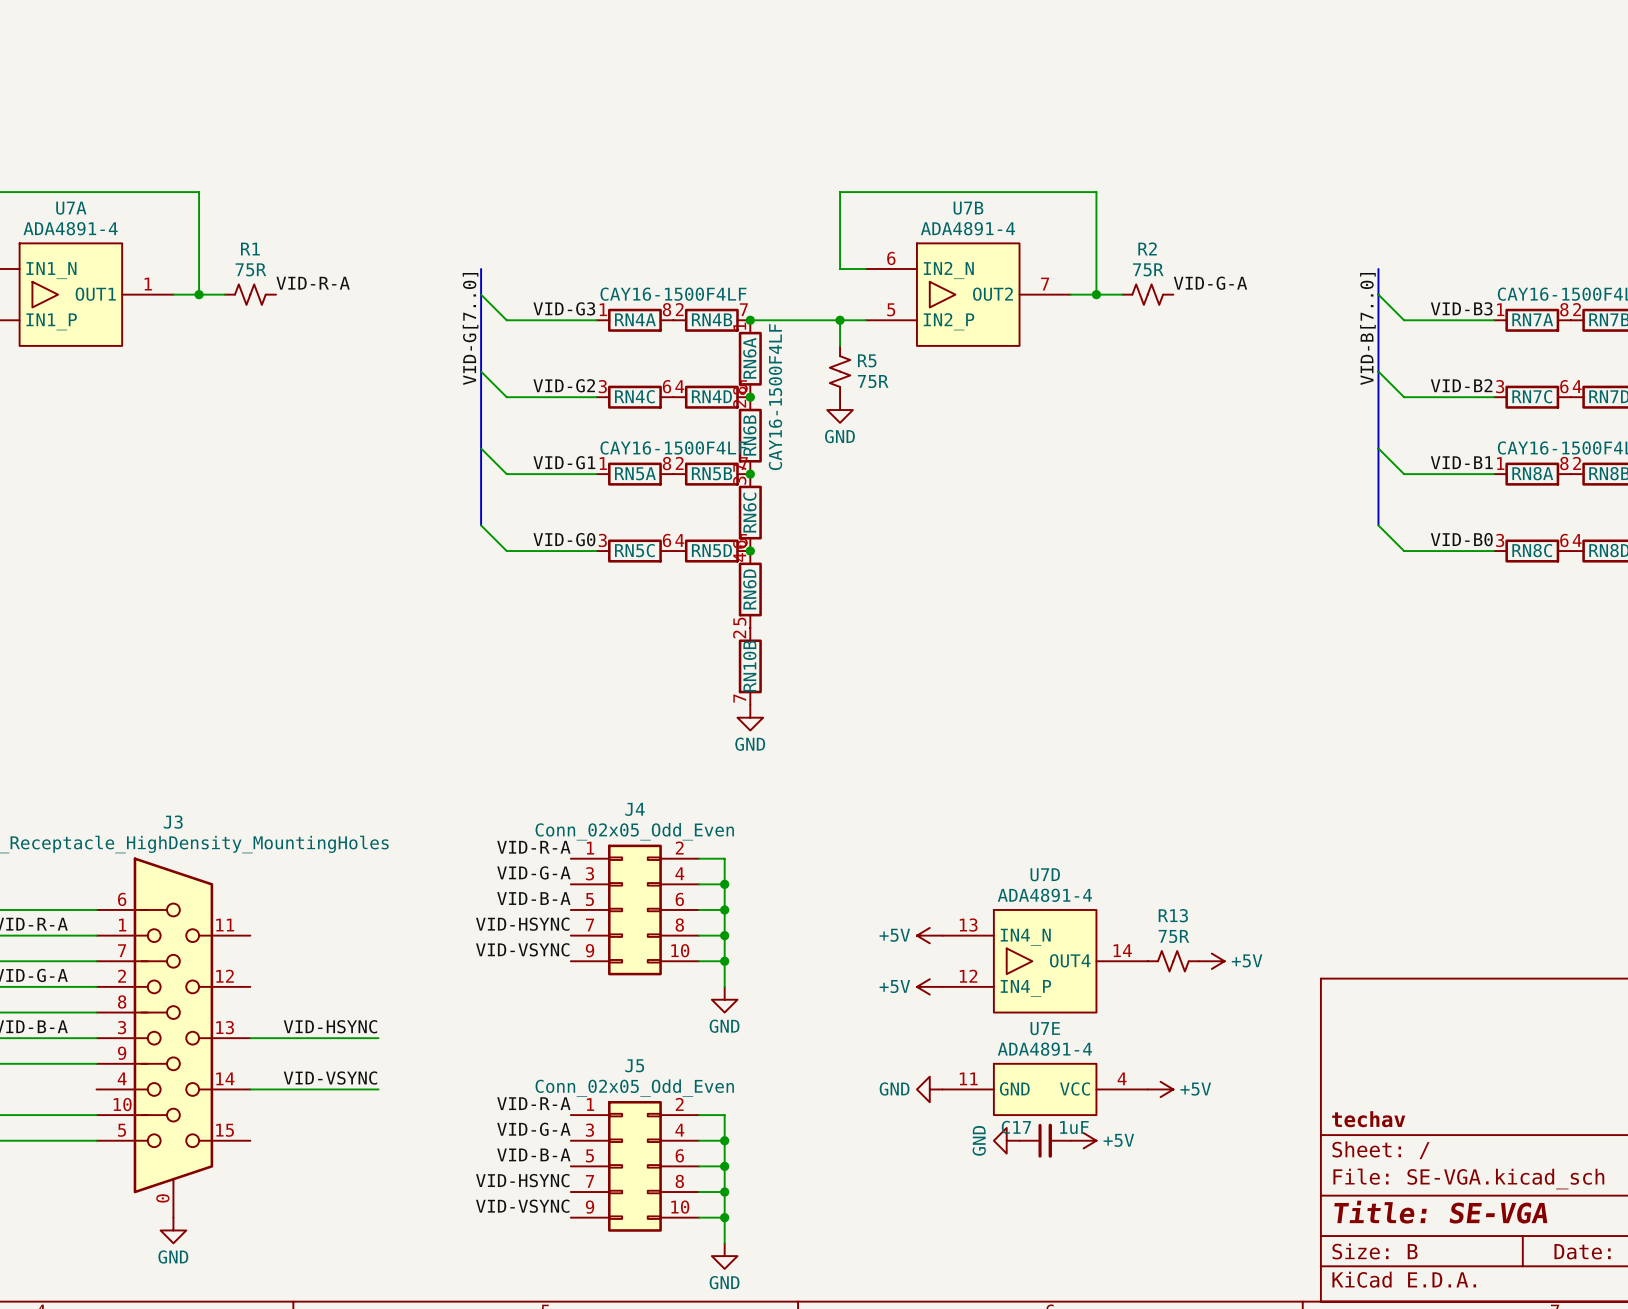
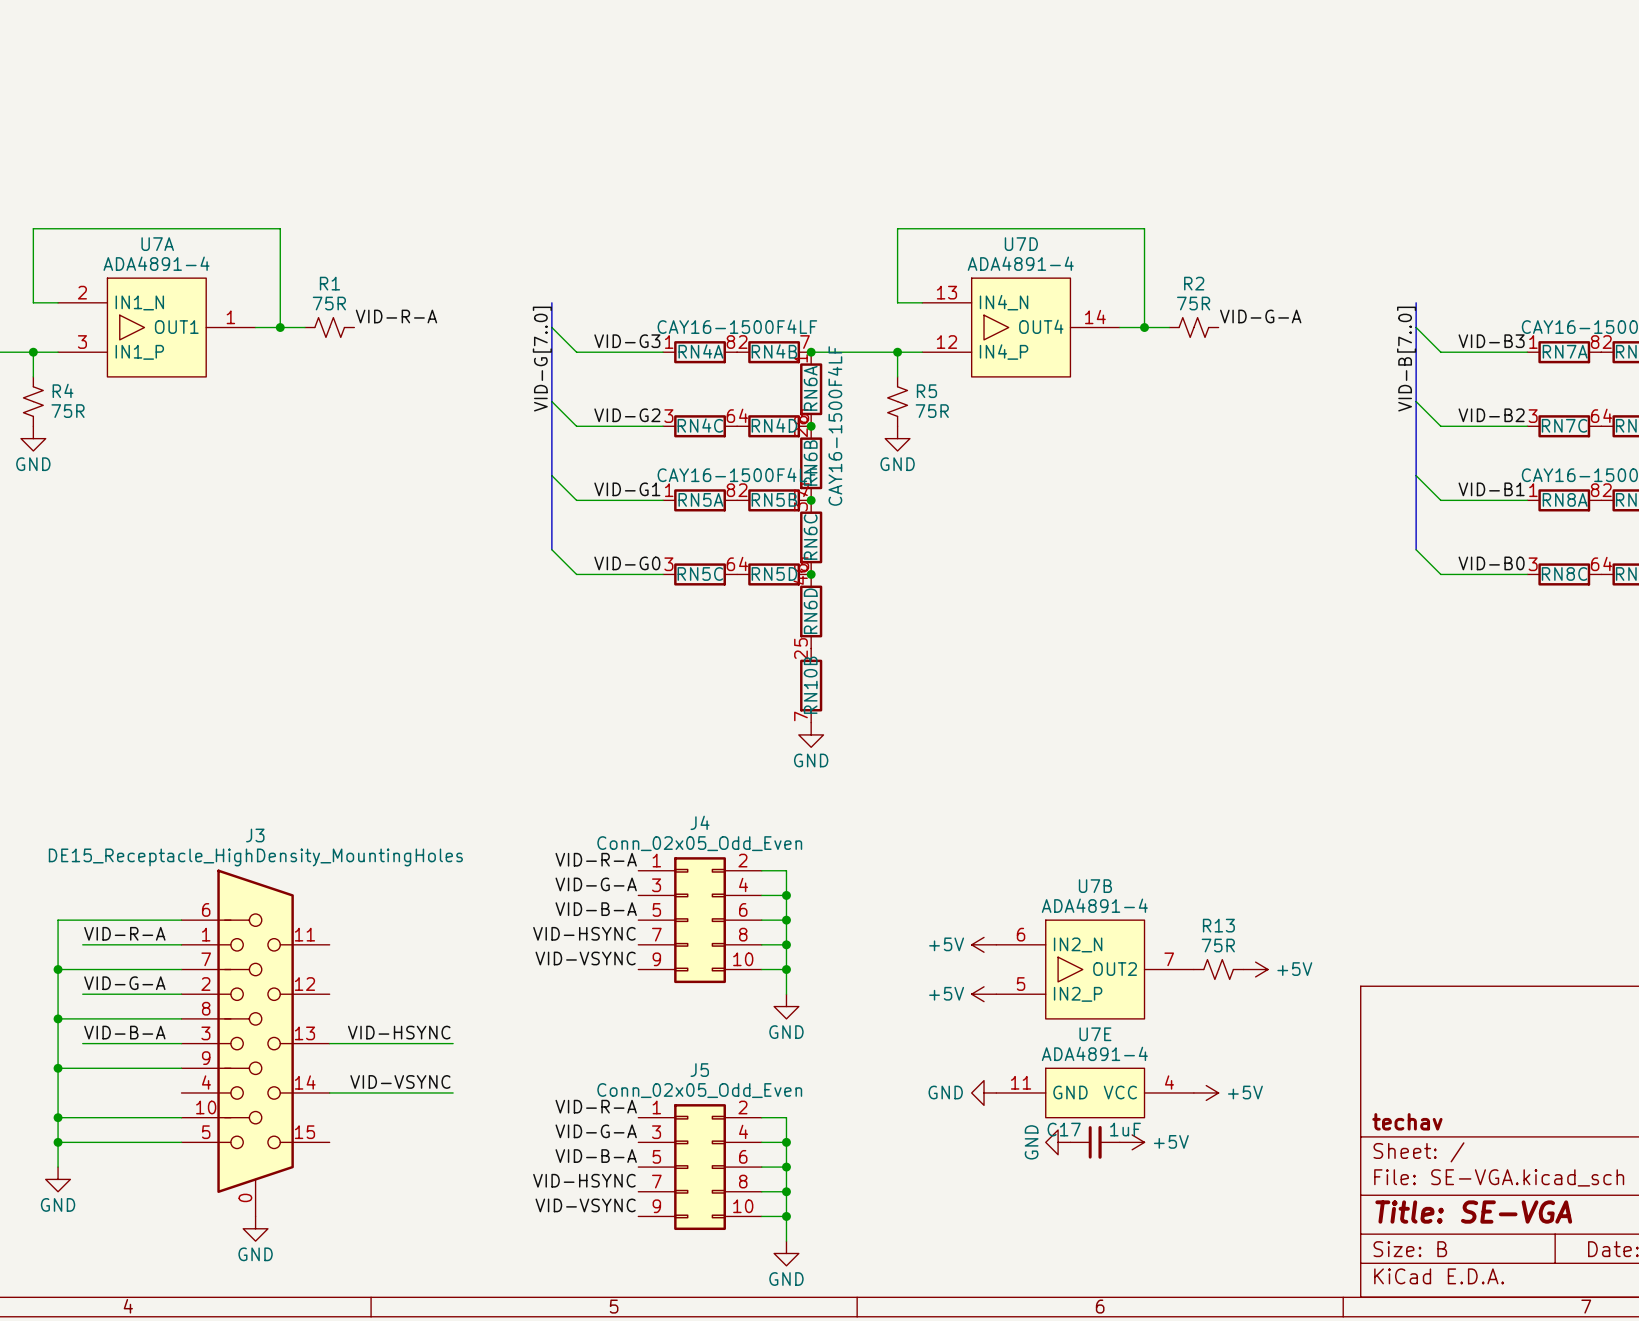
U7B position: (968, 294) -> (1095, 969)
U7D position: (1045, 961) -> (1021, 327)

